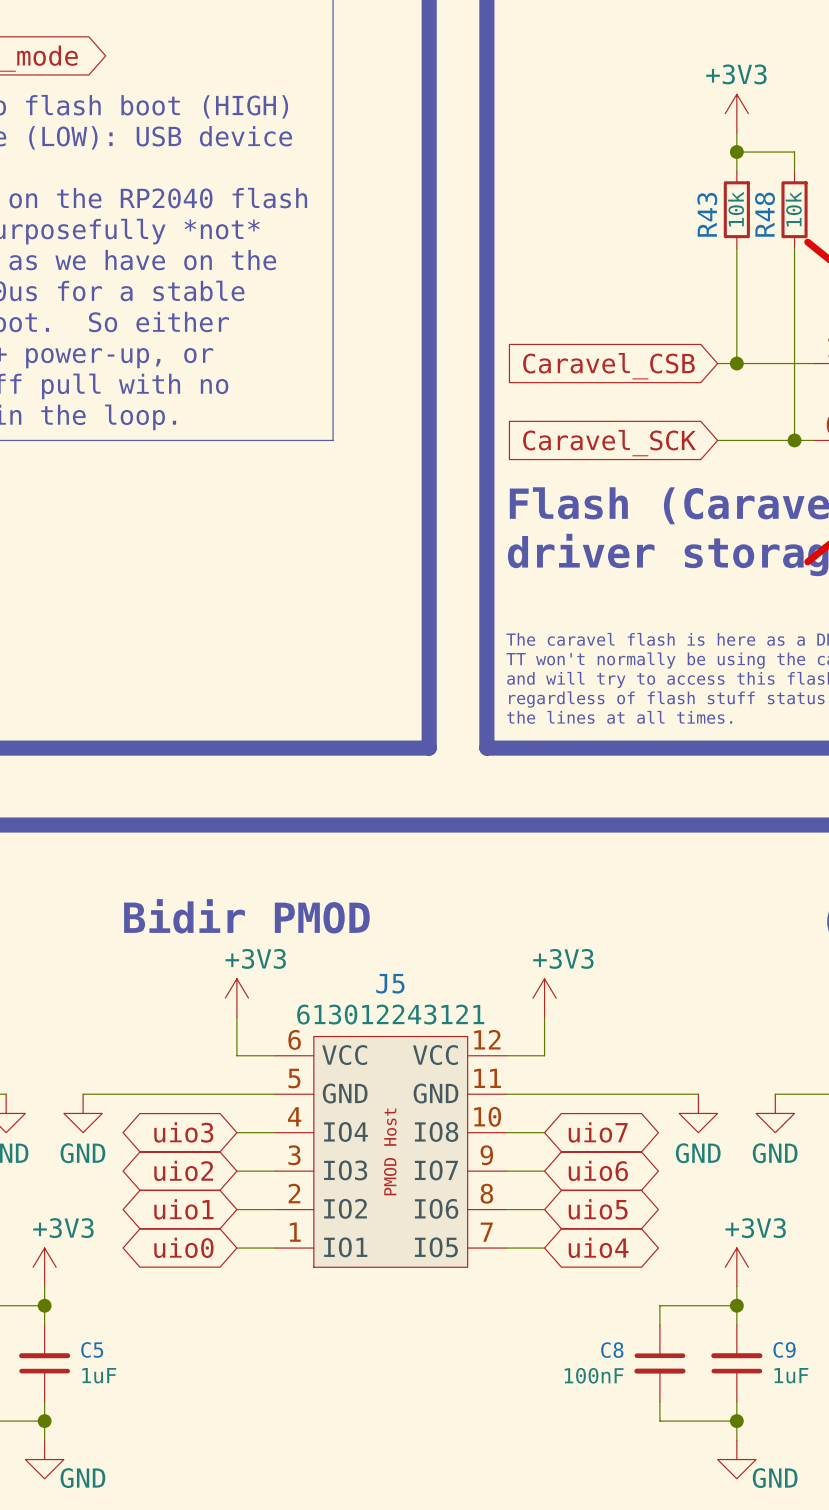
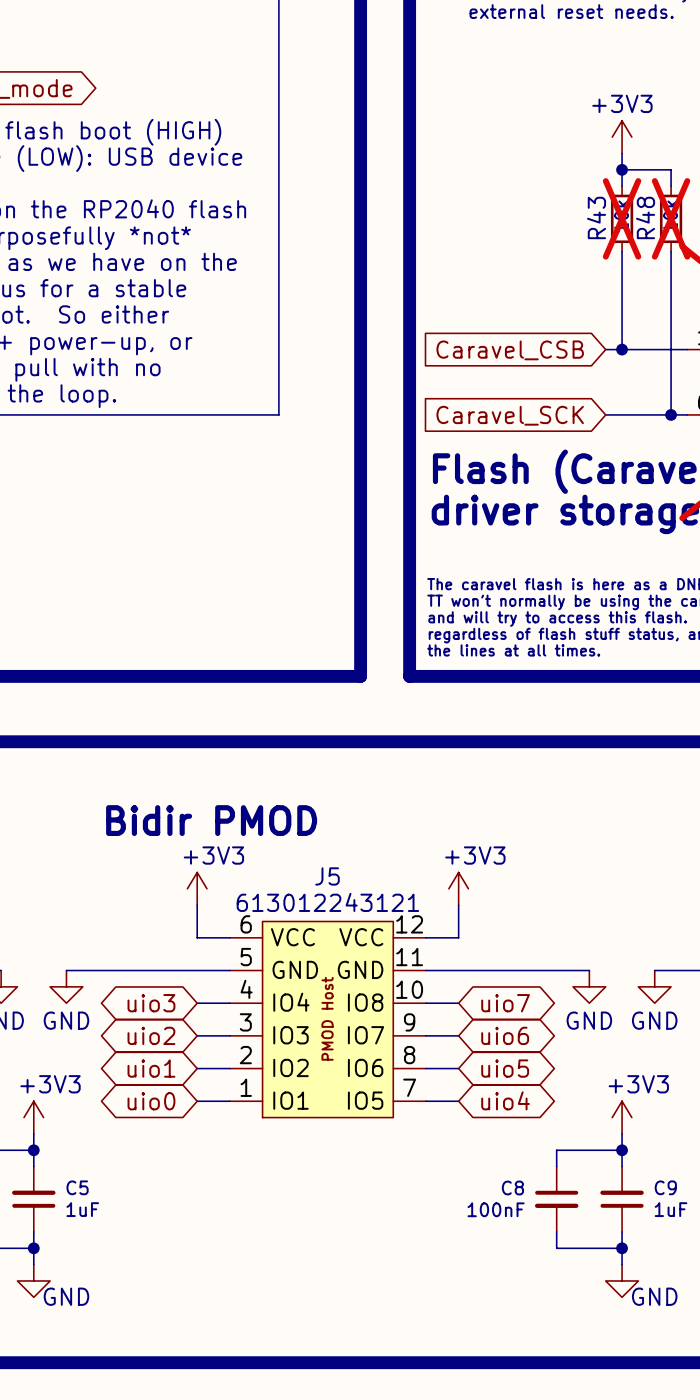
R43 do-not-place cross: none -> (622, 218)
R48 do-not-place cross: none -> (671, 218)

